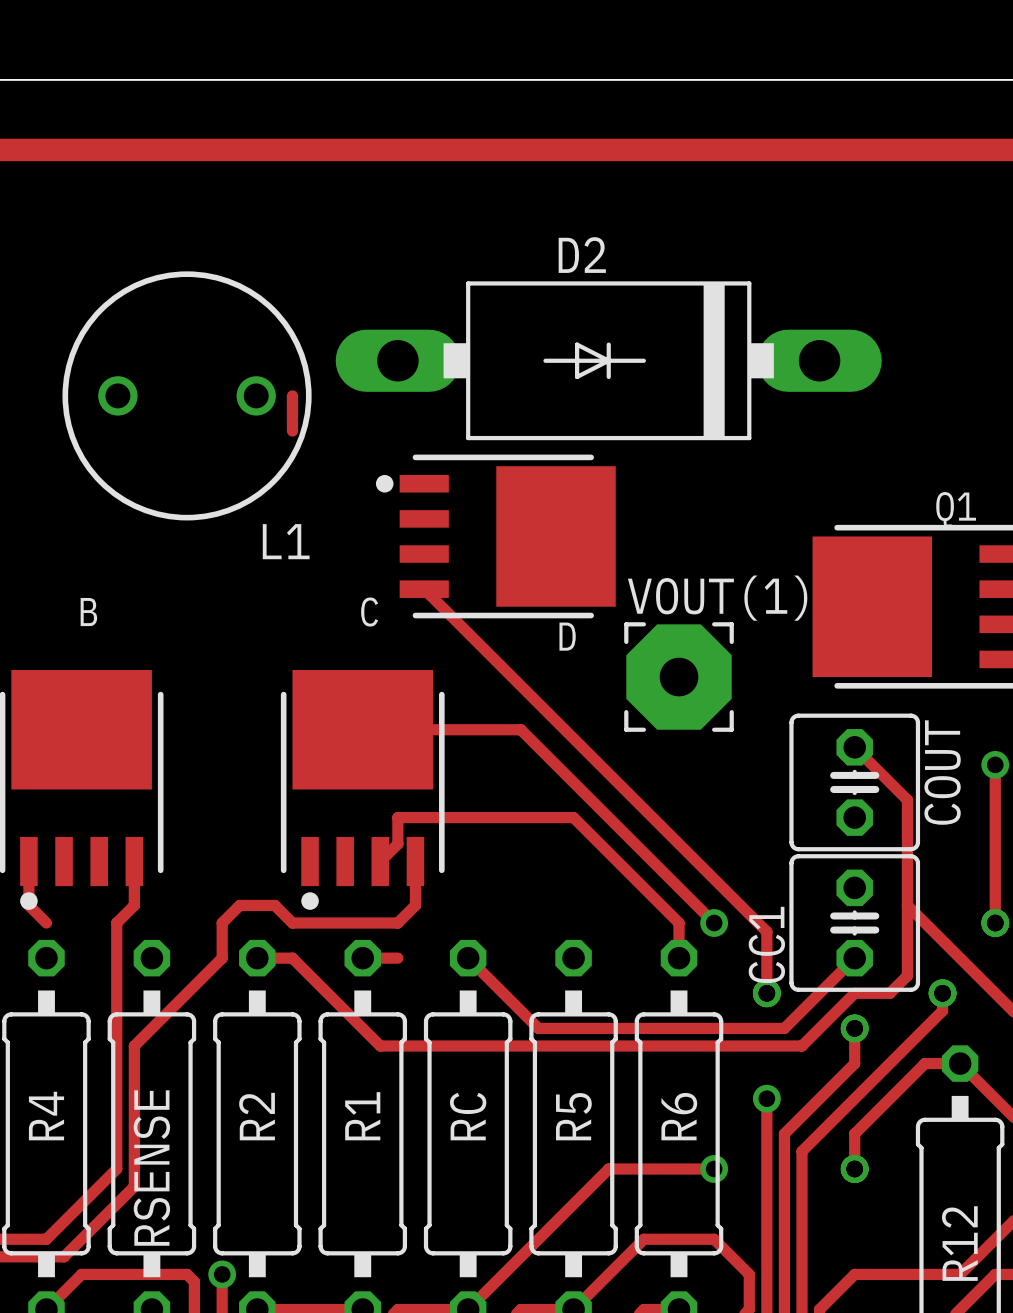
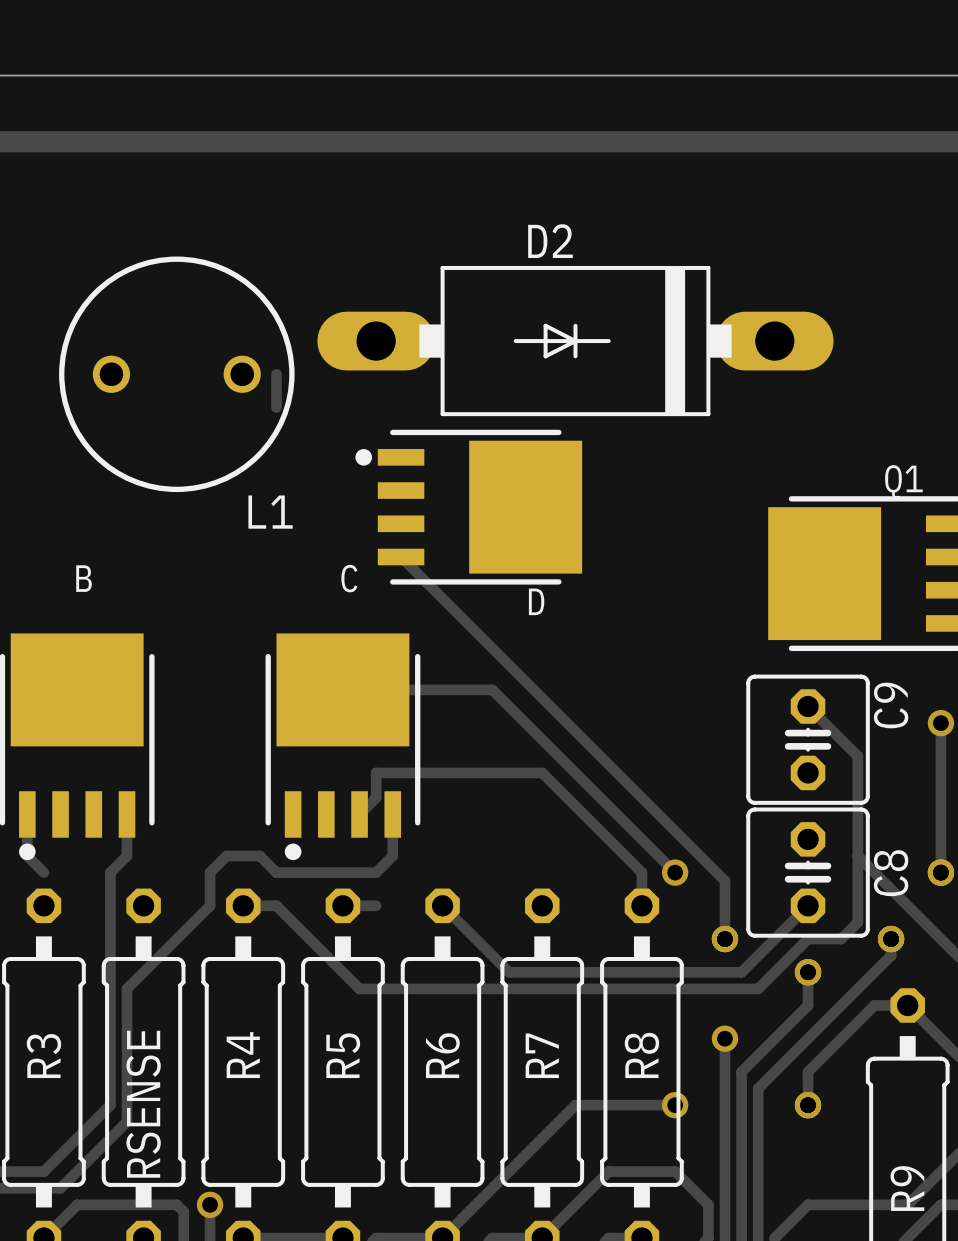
VOUT(1): (679, 677) -> none
COUT name: COUT (942, 772) -> C9 (891, 705)
CC1 name: CC1 (766, 944) -> C8 (891, 873)
R4 name: R4 (46, 1116) -> R3 (43, 1056)
R2 name: R2 (257, 1116) -> R4 (243, 1055)
R1 name: R1 (362, 1116) -> R5 (343, 1055)
RC name: RC (468, 1116) -> R6 (442, 1055)
R5 name: R5 (573, 1116) -> R7 (542, 1055)
R6 name: R6 (679, 1116) -> R8 (641, 1055)
R12 name: R12 (959, 1243) -> R9 (907, 1188)

